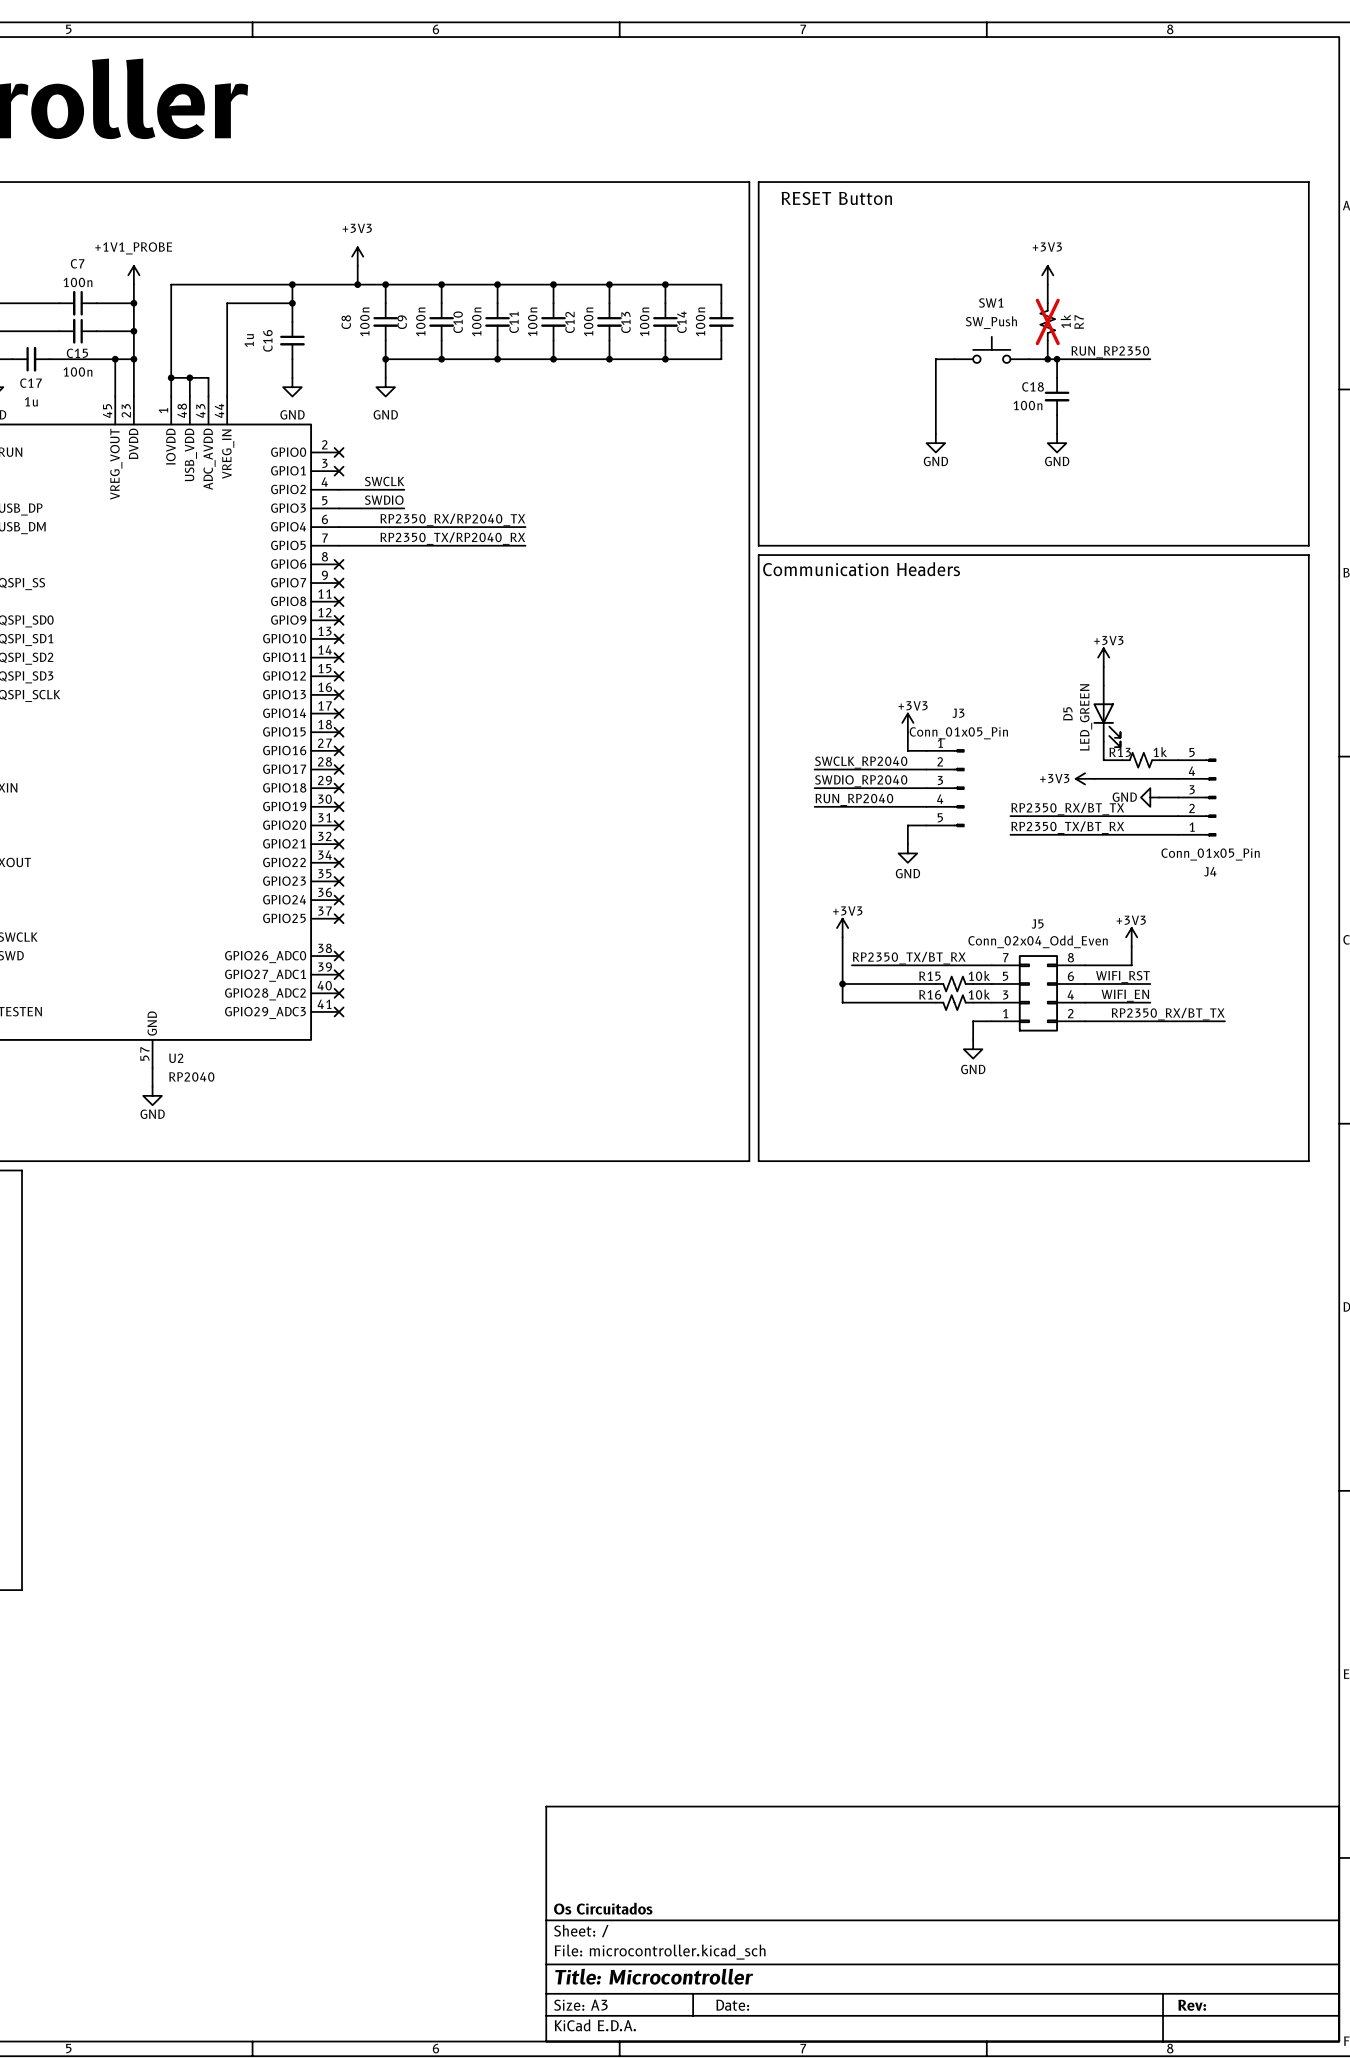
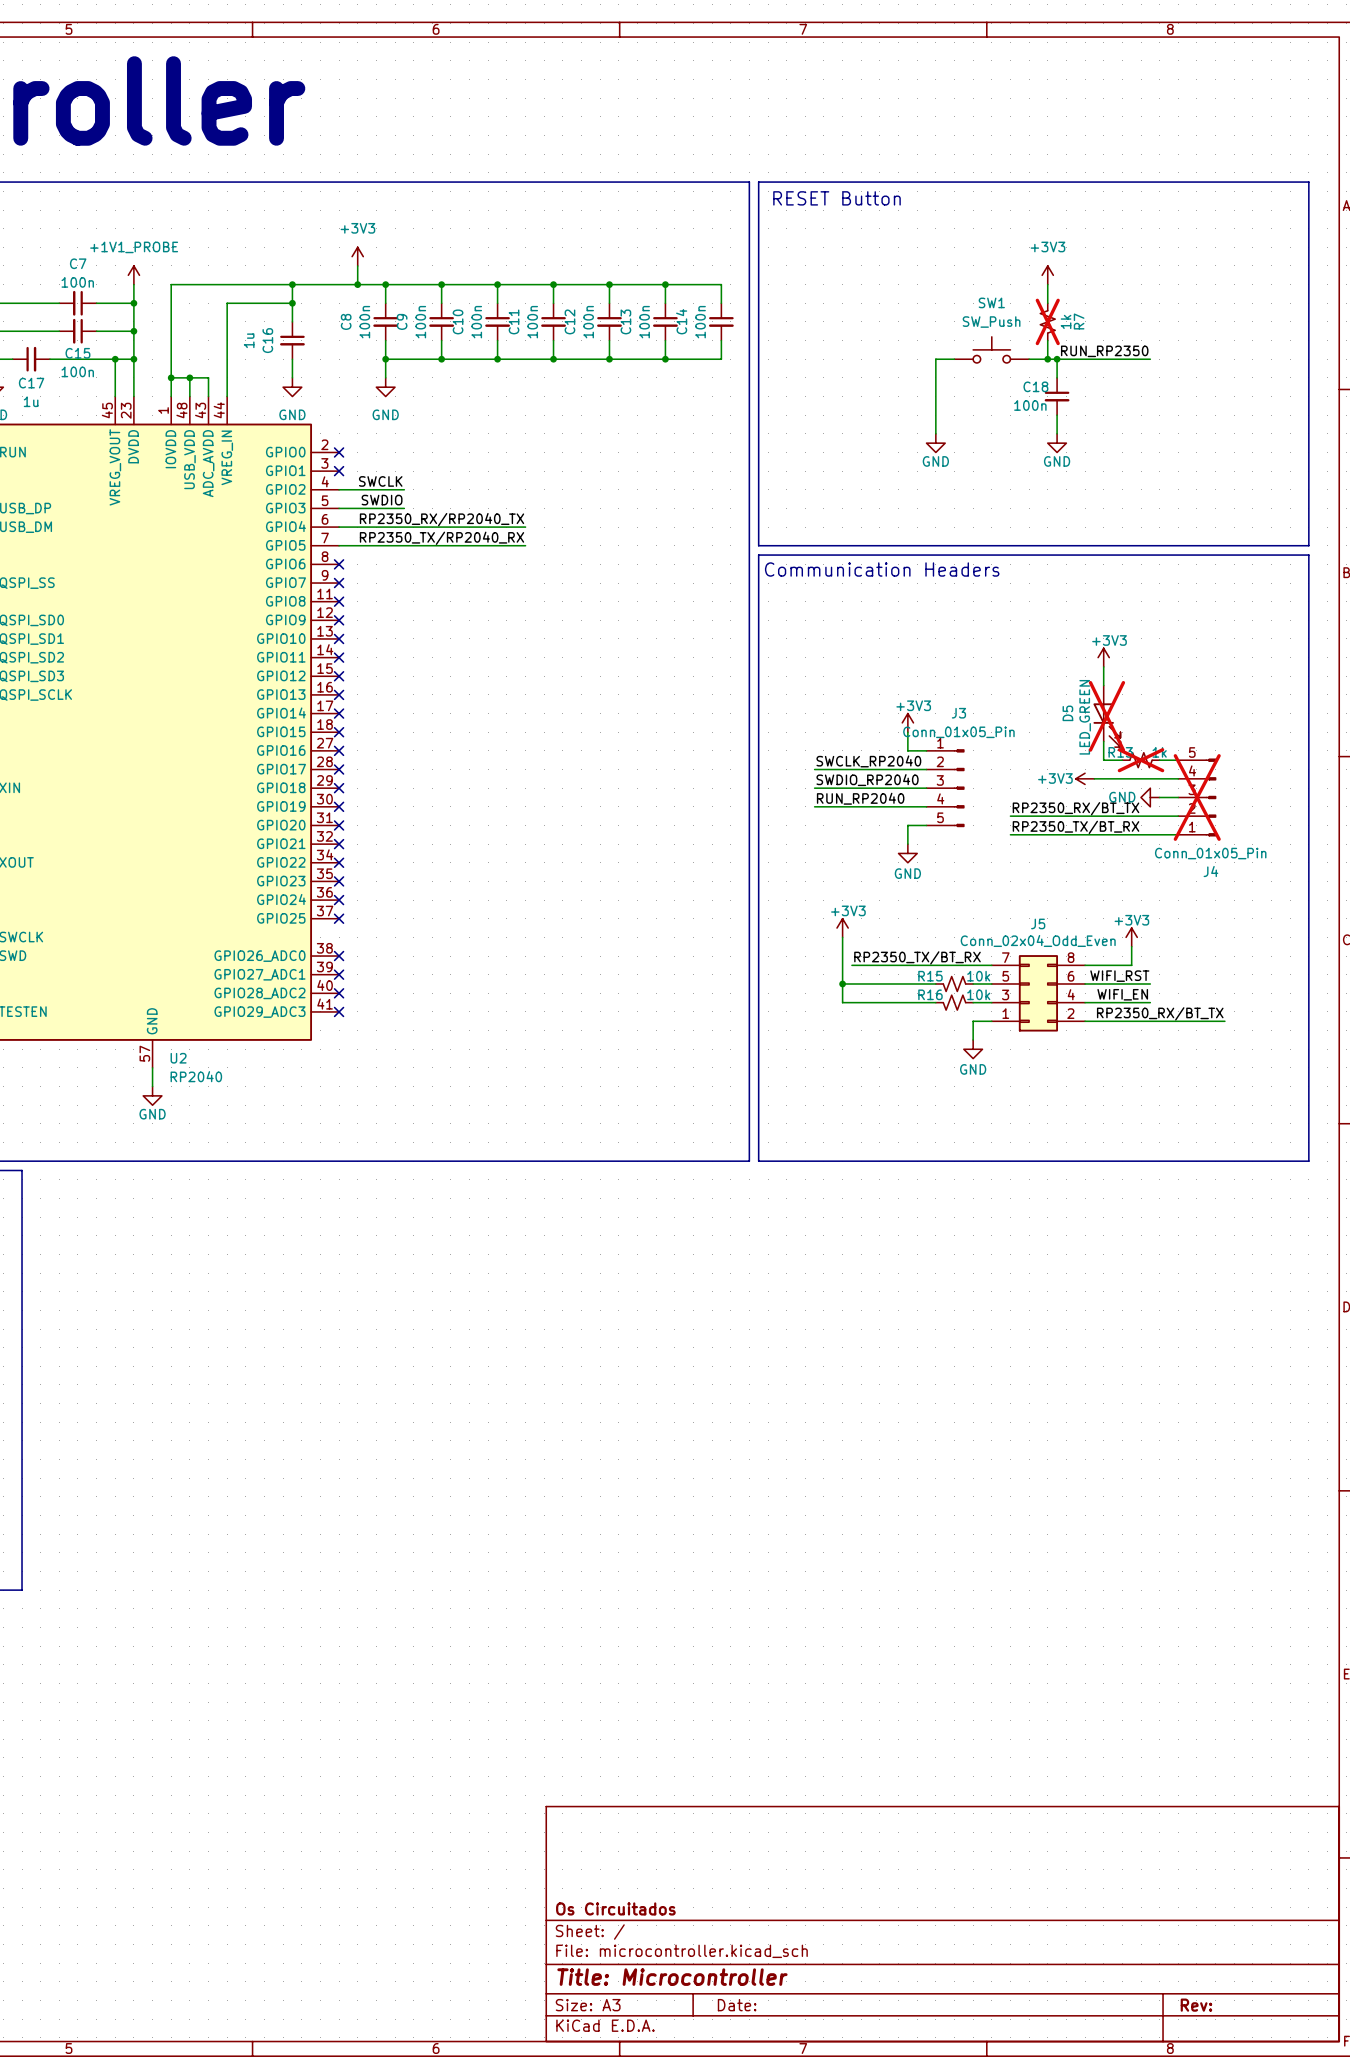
D5 do-not-place cross: none -> (1106, 716)
R13 do-not-place cross: none -> (1141, 760)
J4 do-not-place cross: none -> (1197, 797)

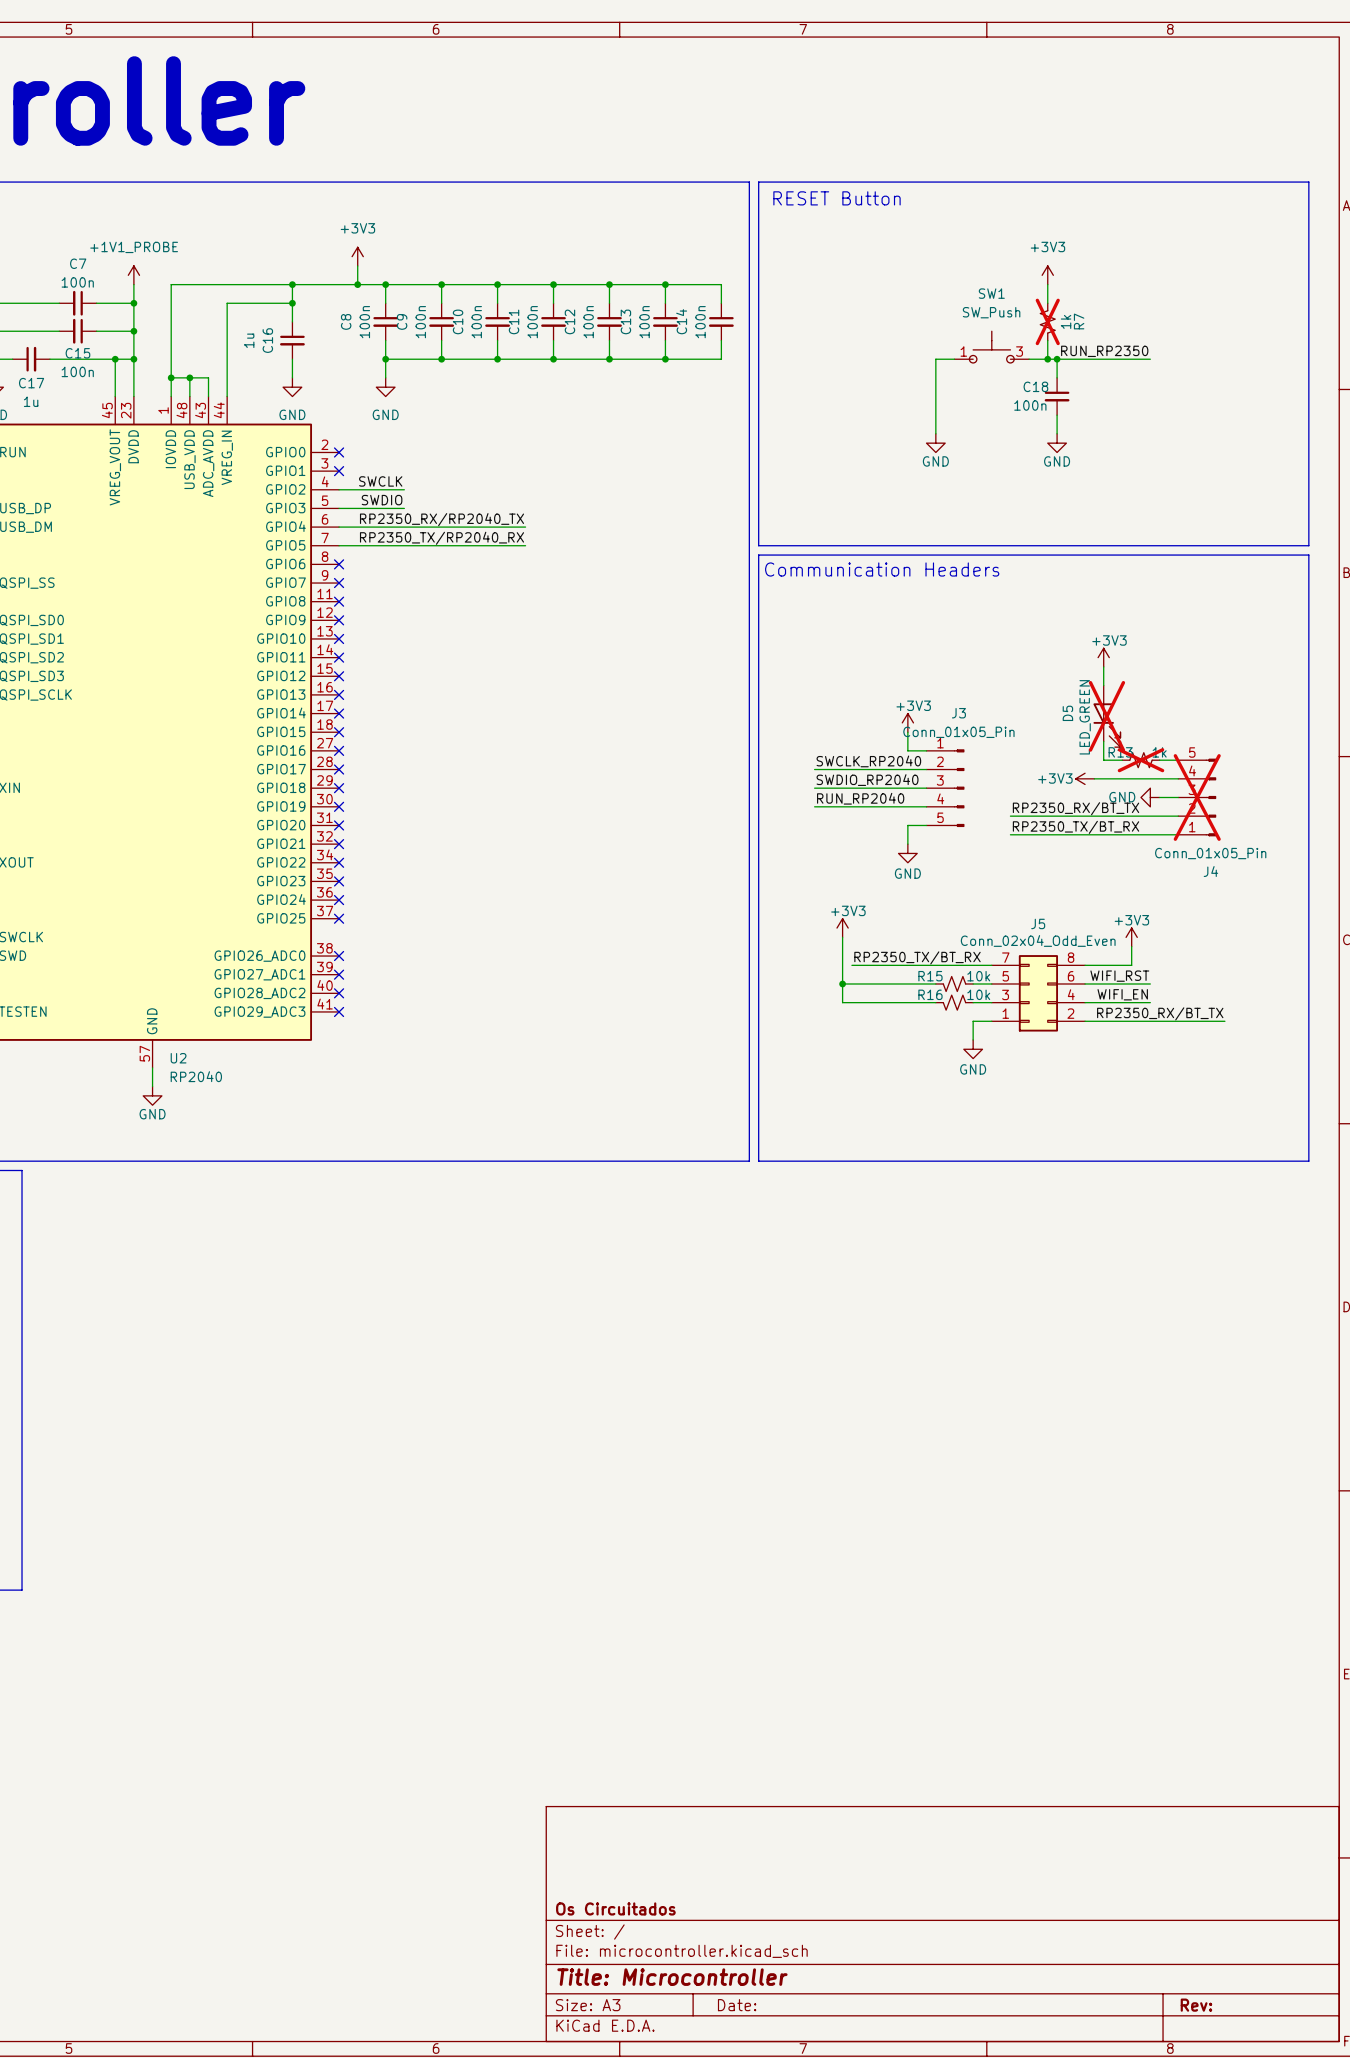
SW1 symbol: [954, 336, 1030, 363] -> [954, 331, 1030, 363]

